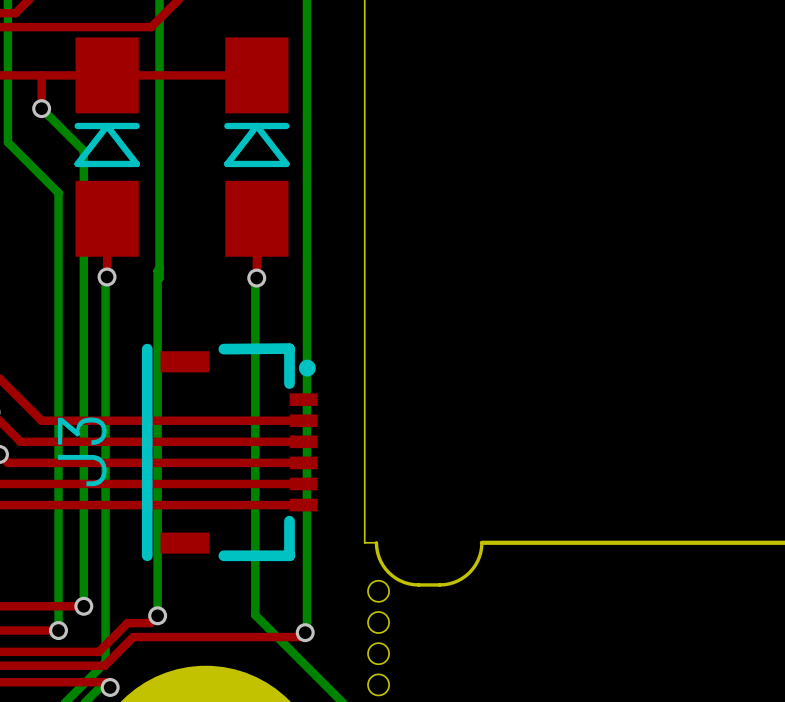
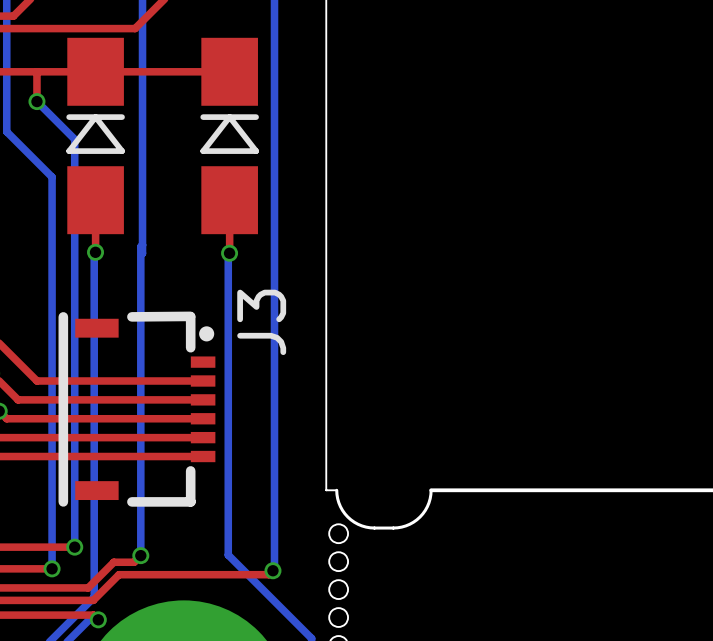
top track: (227, 420) (303, 420) -> none
top track: (227, 441) (303, 441) -> none
J3 name position: J3 (82, 451) -> J3 (261, 322)
J3 position: (229, 452) -> (136, 409)
top track: (227, 462) (303, 462) -> none
top track: (227, 483) (303, 483) -> none
top track: (227, 505) (303, 505) -> none

